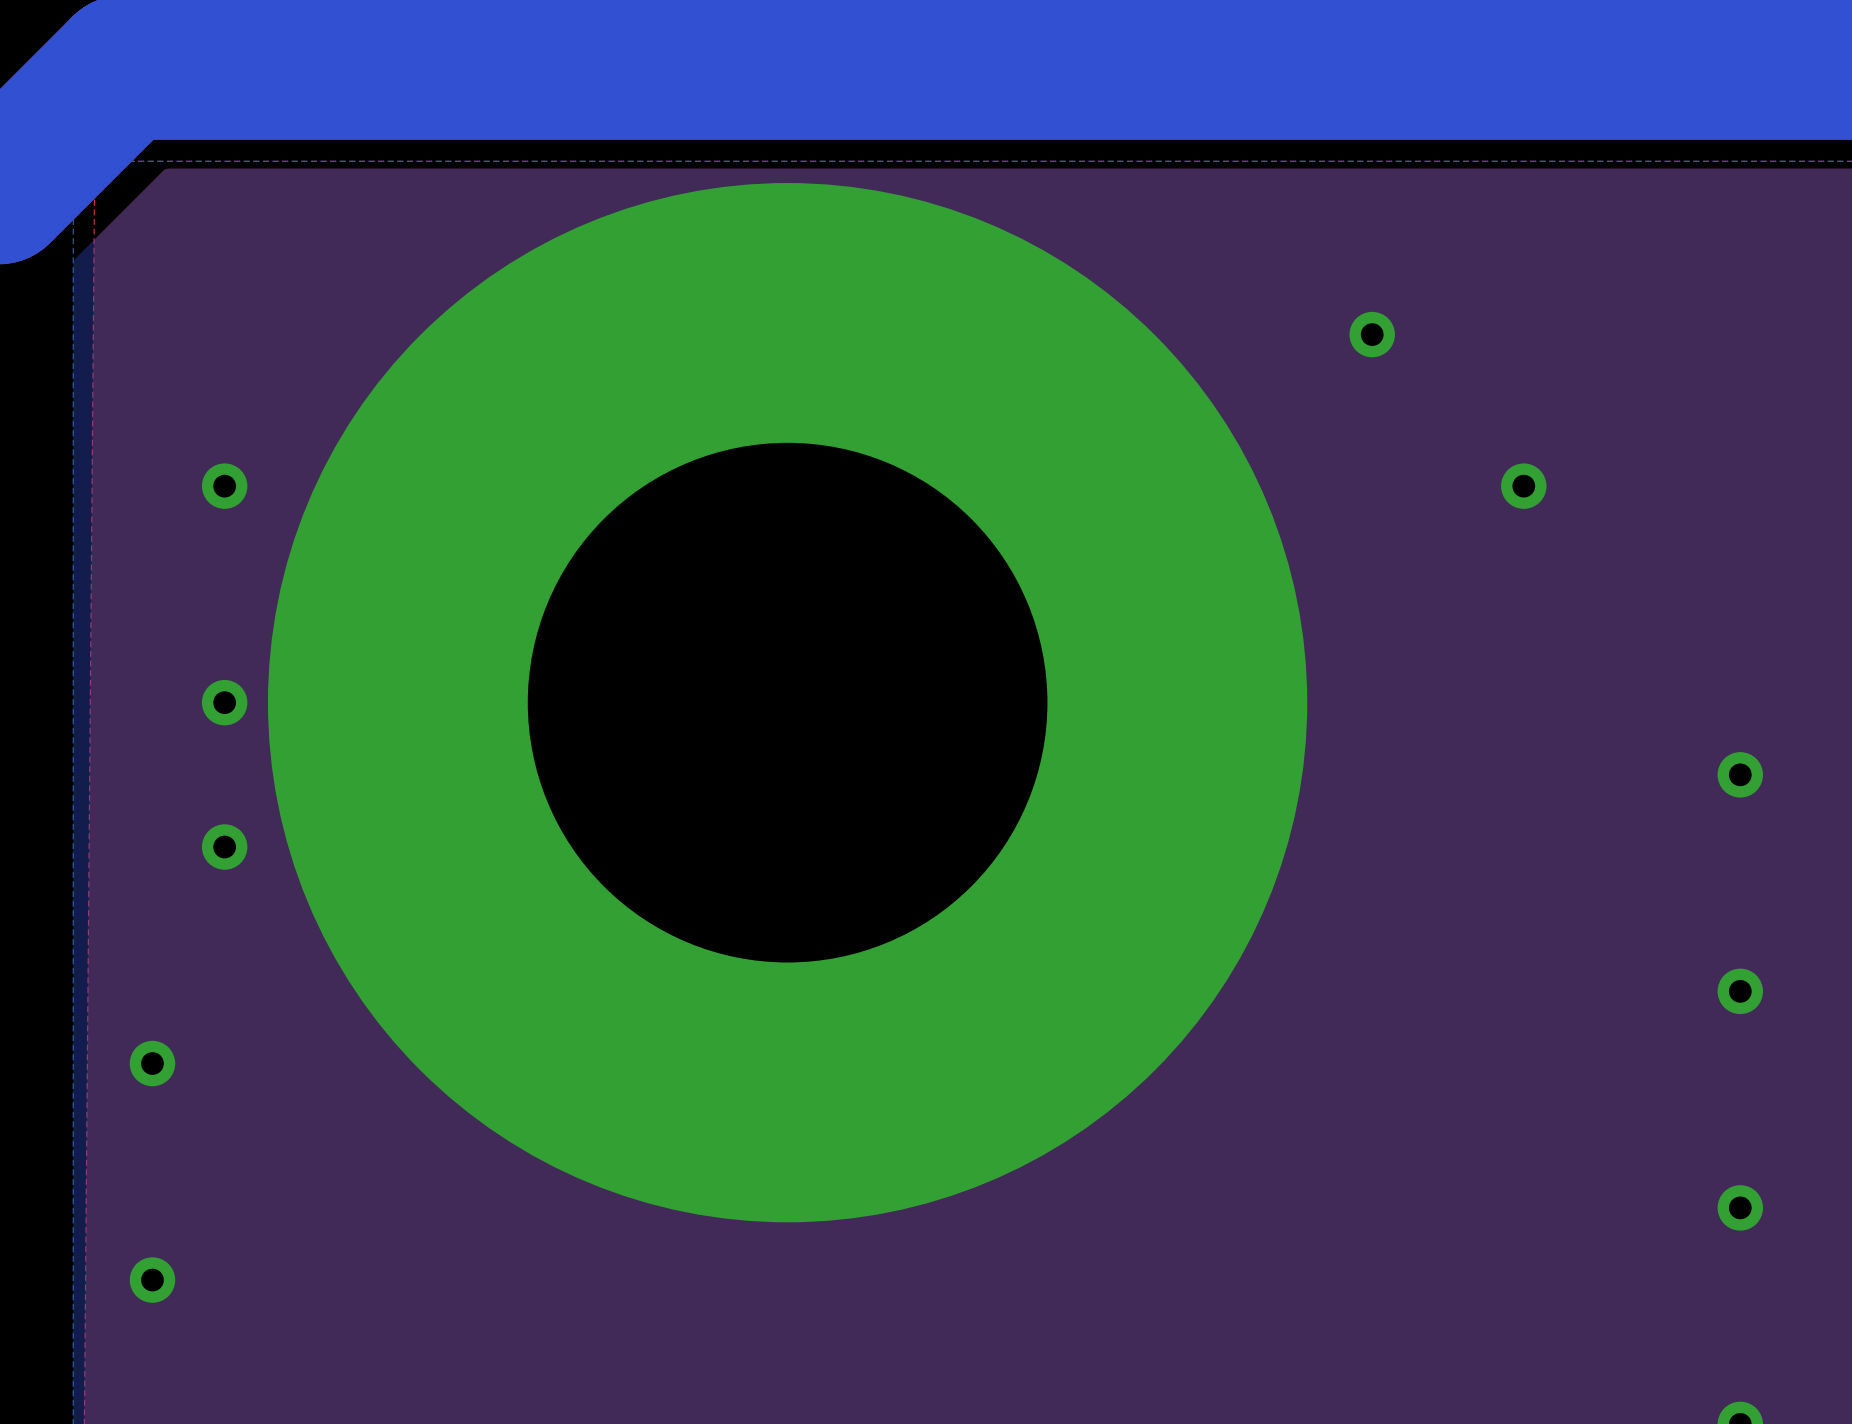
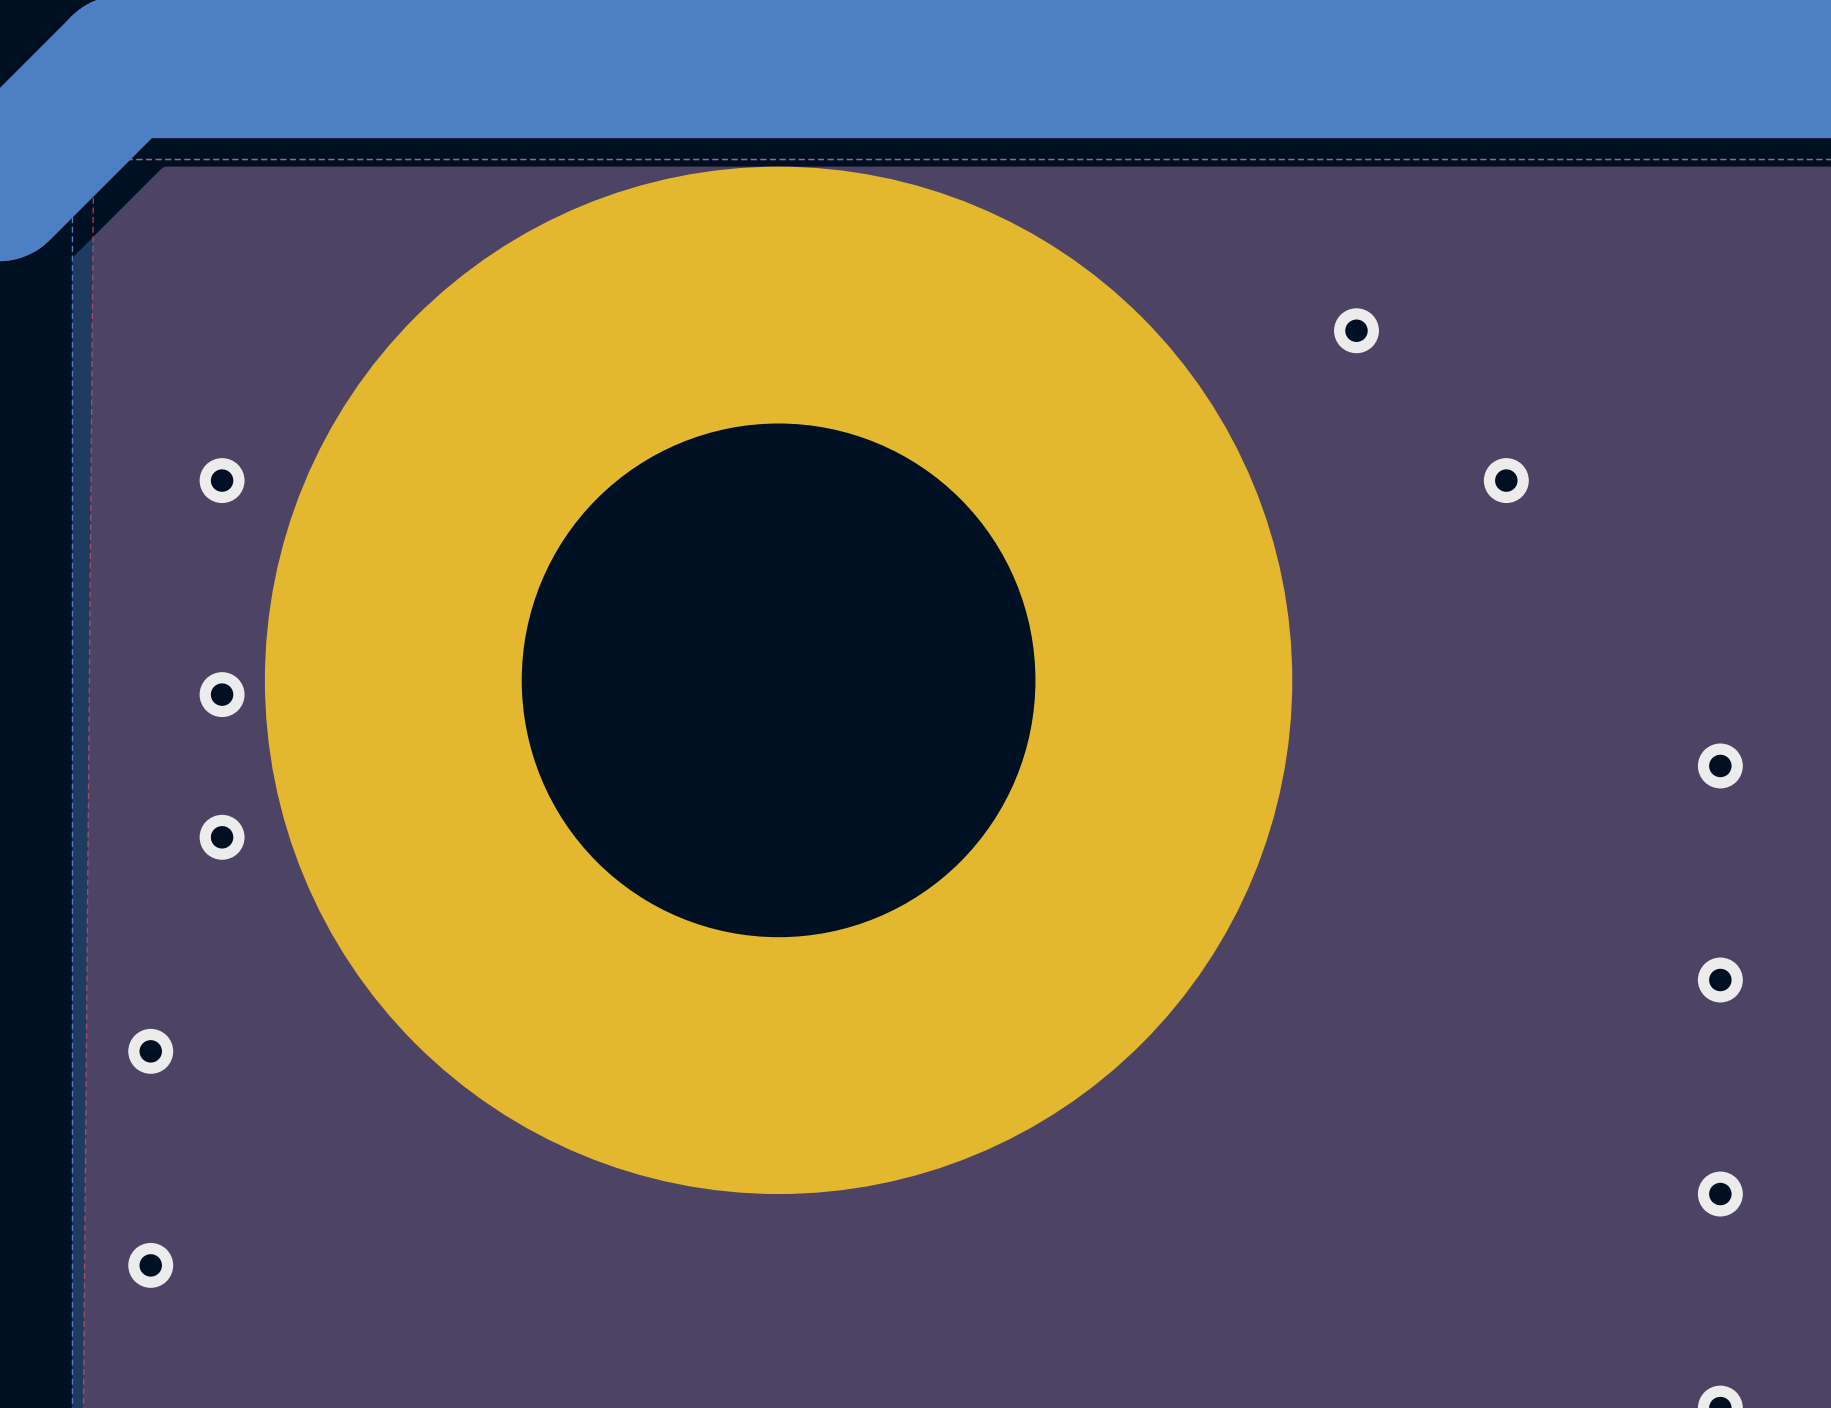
part position: (787, 702) -> (778, 680)

